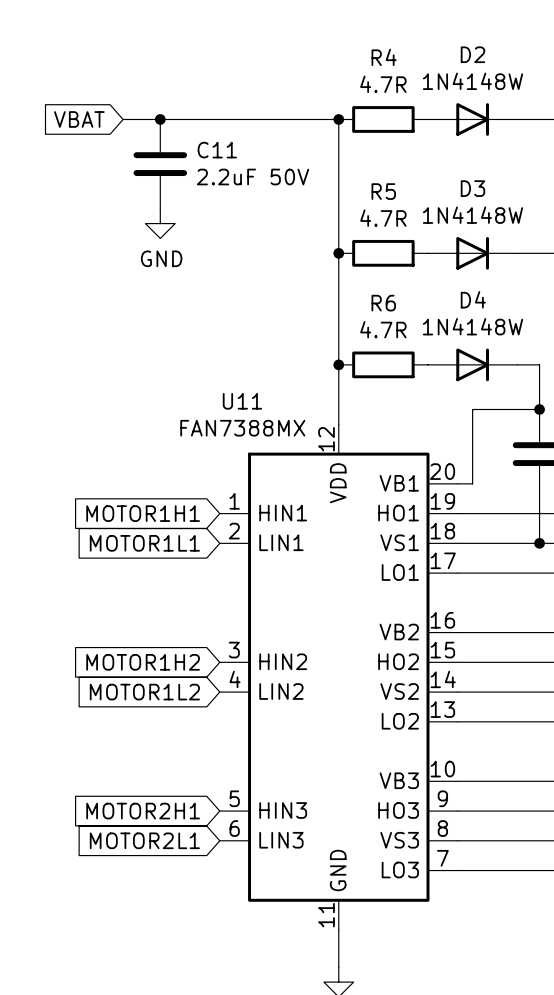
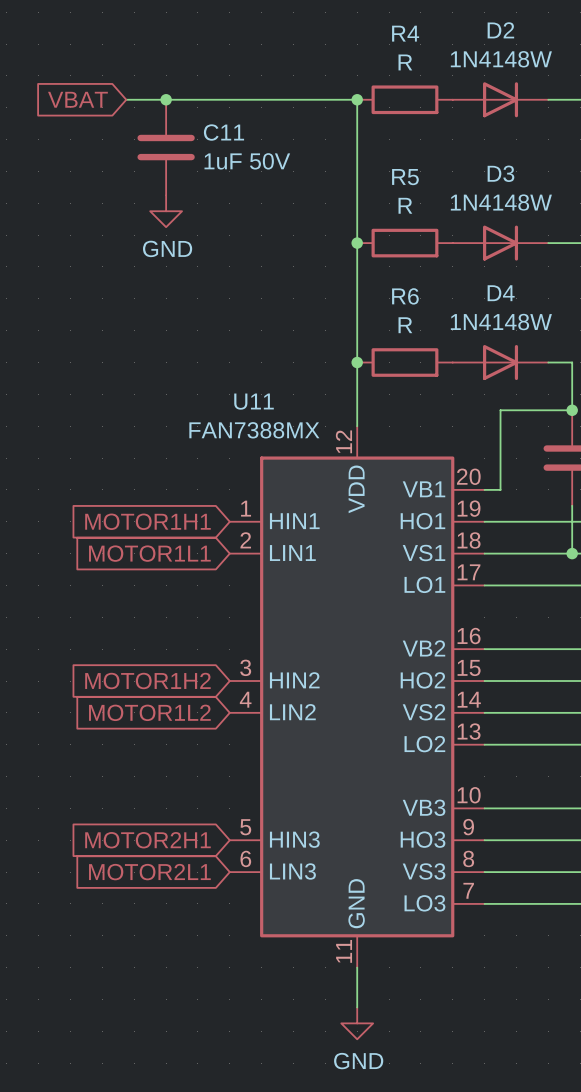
R4 value: 4.7R (383, 84) -> R (405, 62)
C11 value: 2.2uF 50V (253, 177) -> 1uF 50V (247, 161)
R5 value: 4.7R (383, 218) -> R (405, 205)
R6 value: 4.7R (383, 329) -> R (405, 325)

